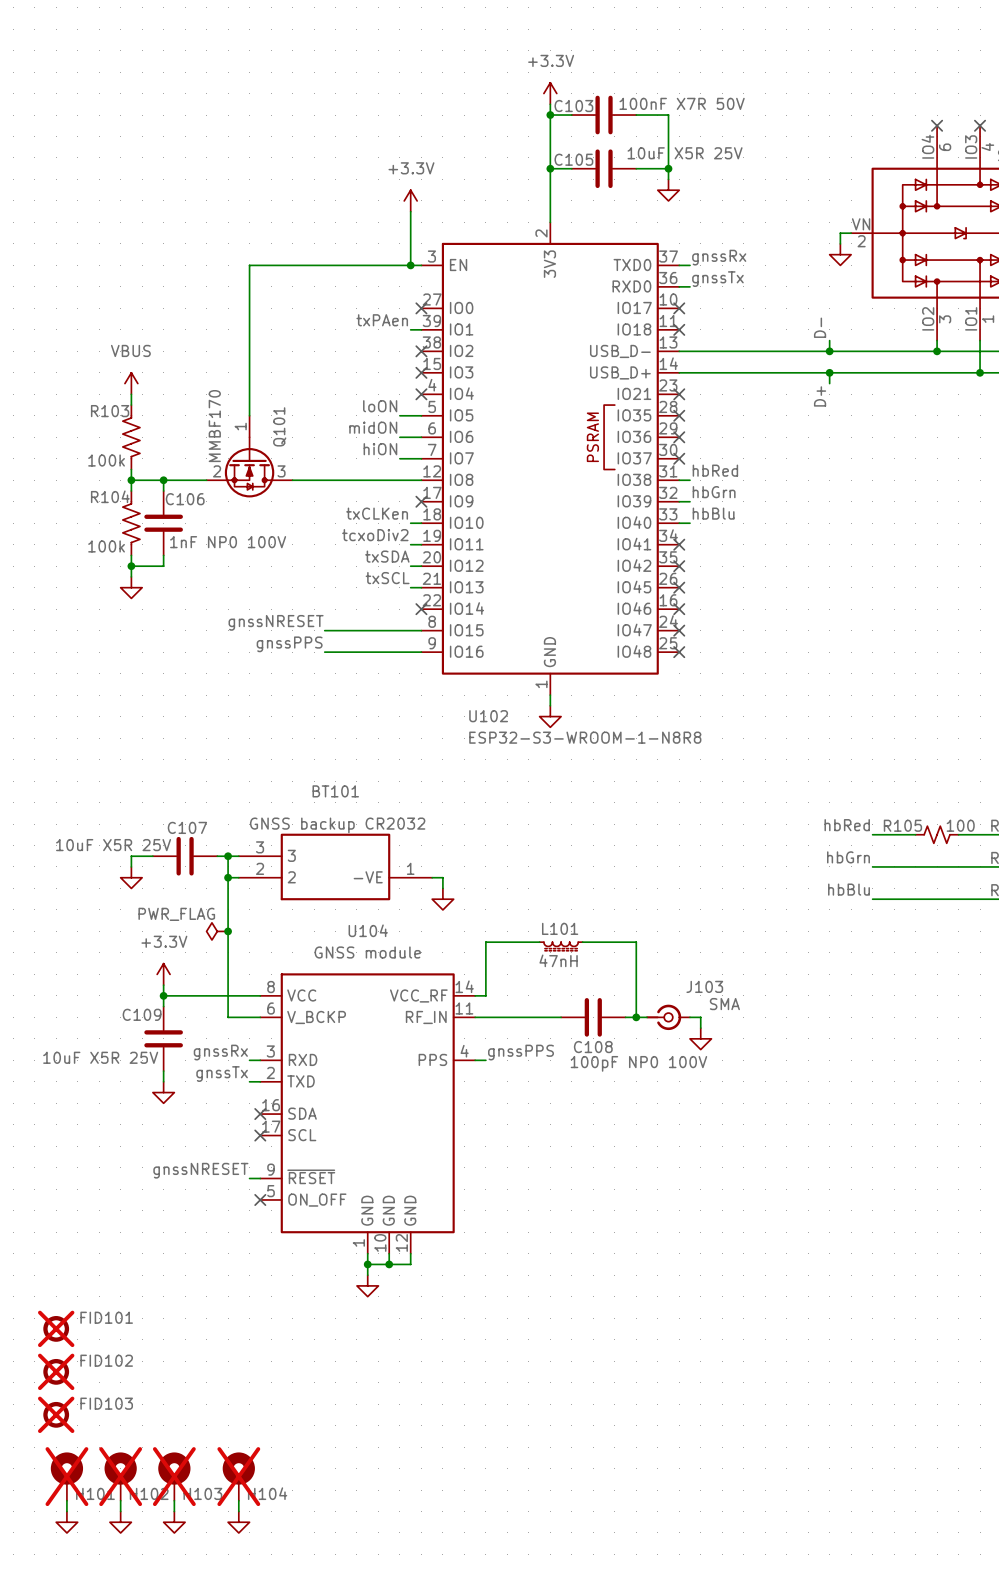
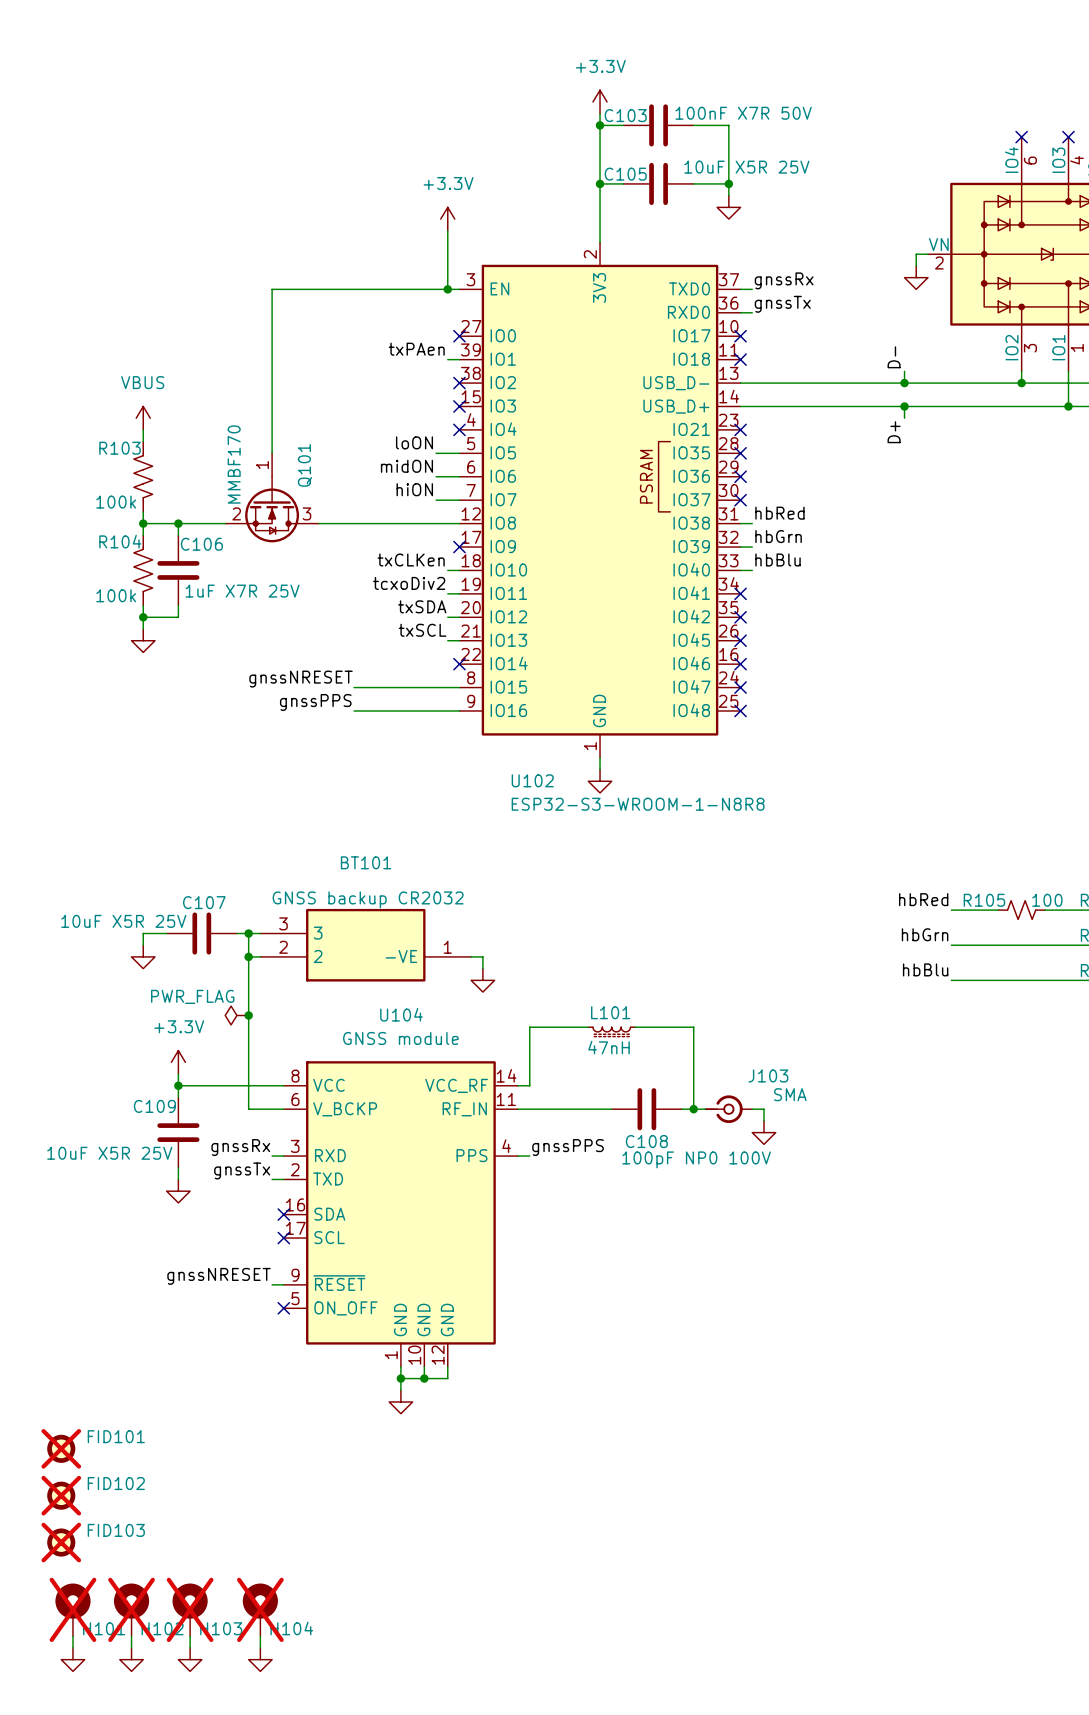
C106 value: 1nF NP0 100V (228, 542) -> 1uF X7R 25V (242, 591)

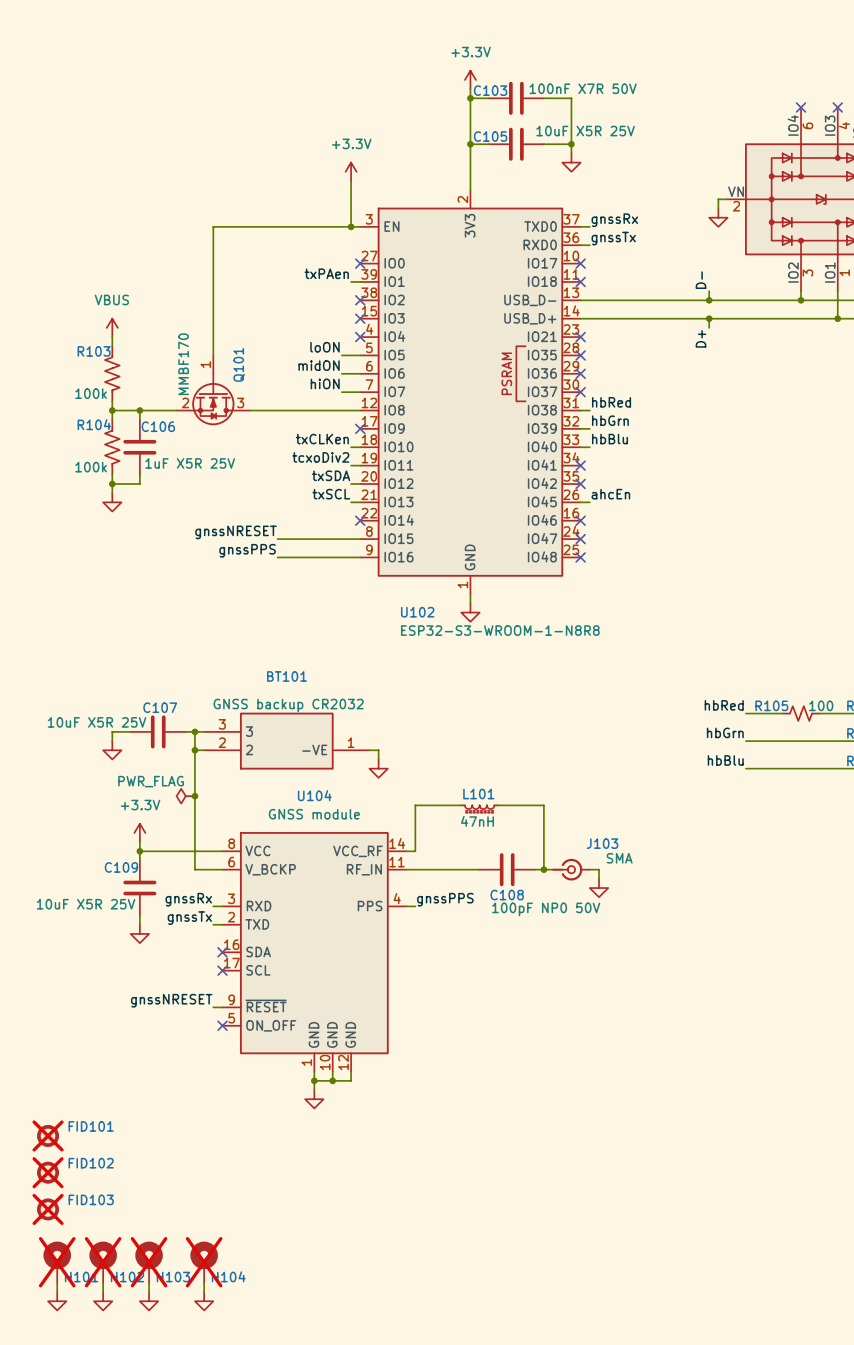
C106 value: 1uF X7R 25V (242, 591) -> 1uF X5R 25V (190, 463)
label: none -> ahcEn (610, 494)
wire: none -> (580, 502) (589, 502)
no-connect mark: (740, 640) -> none
C108 value: 100pF NP0 100V (696, 1159) -> 100pF NP0 50V (546, 909)

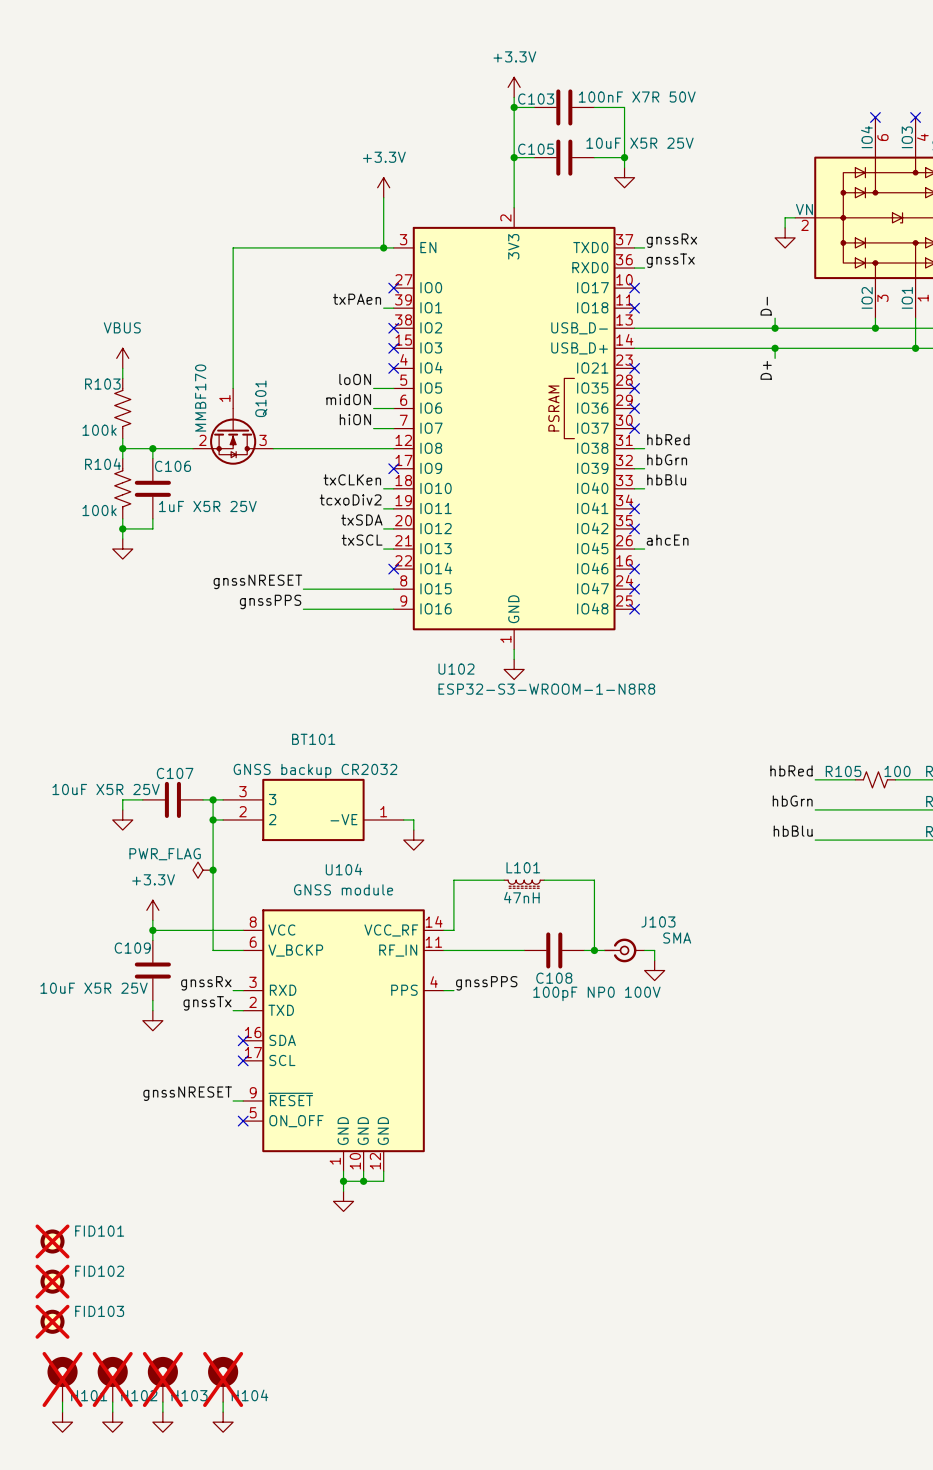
C108 value: 100pF NP0 50V (546, 909) -> 100pF NP0 100V (596, 993)

